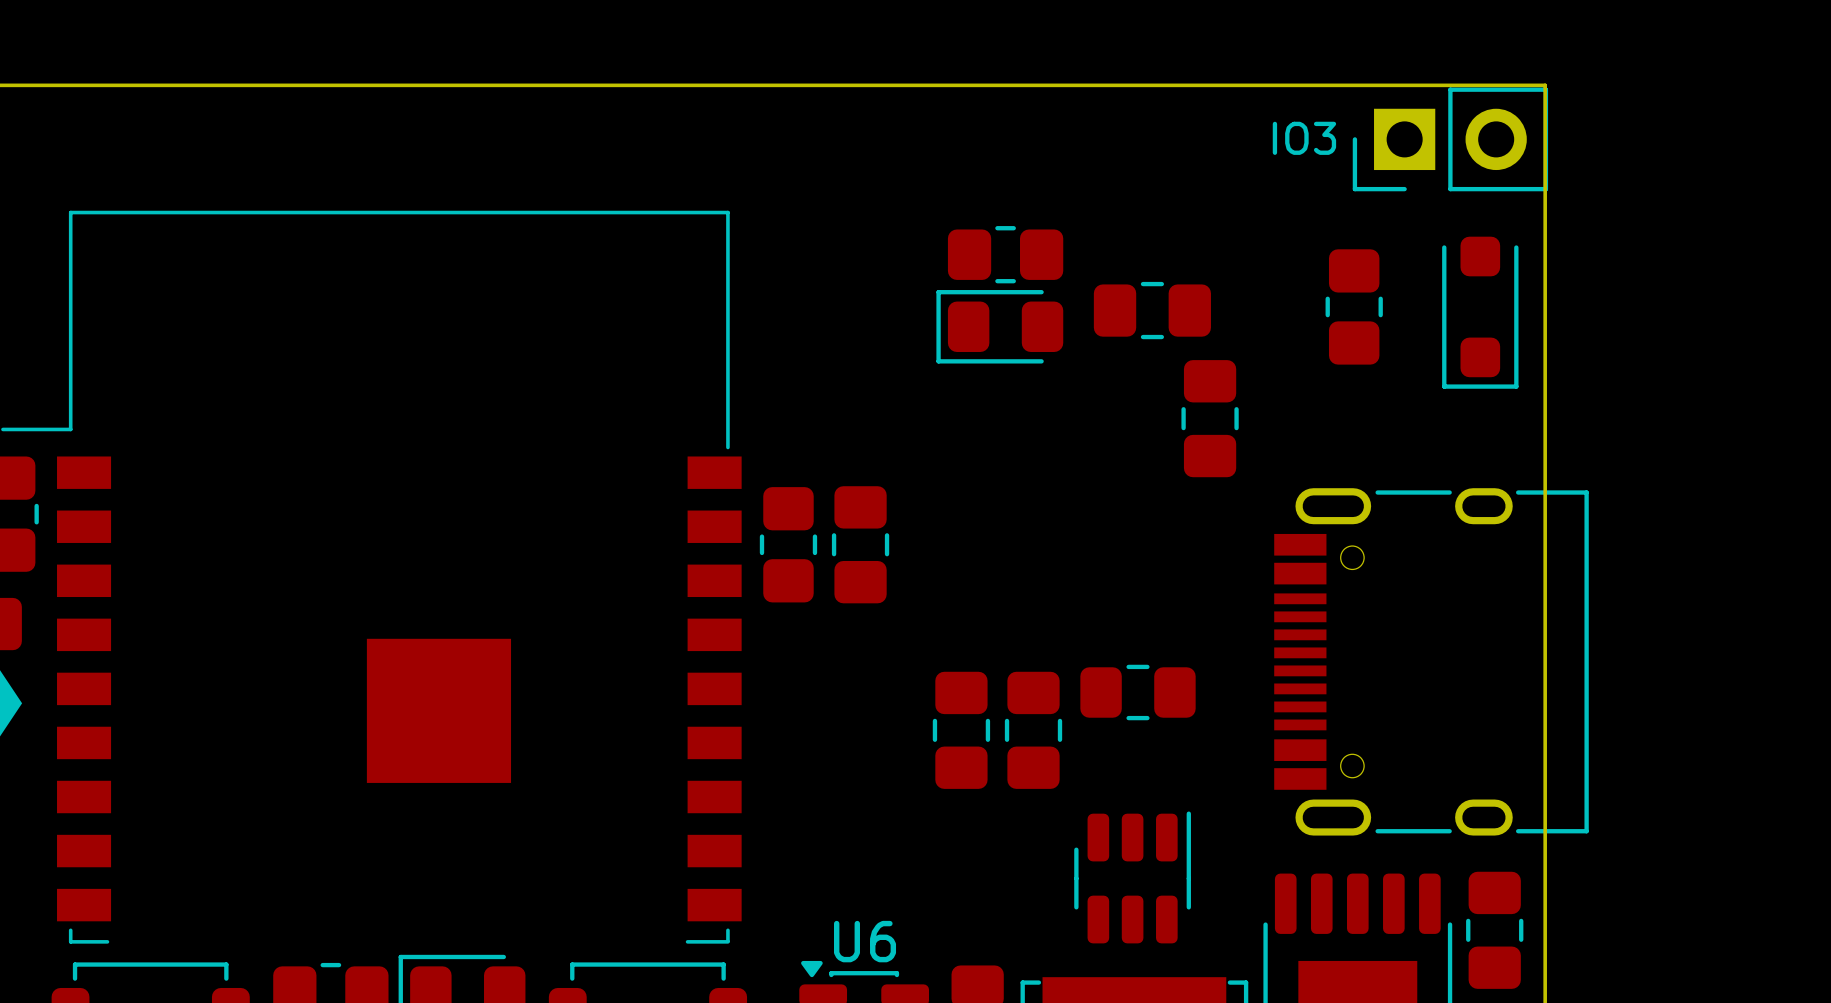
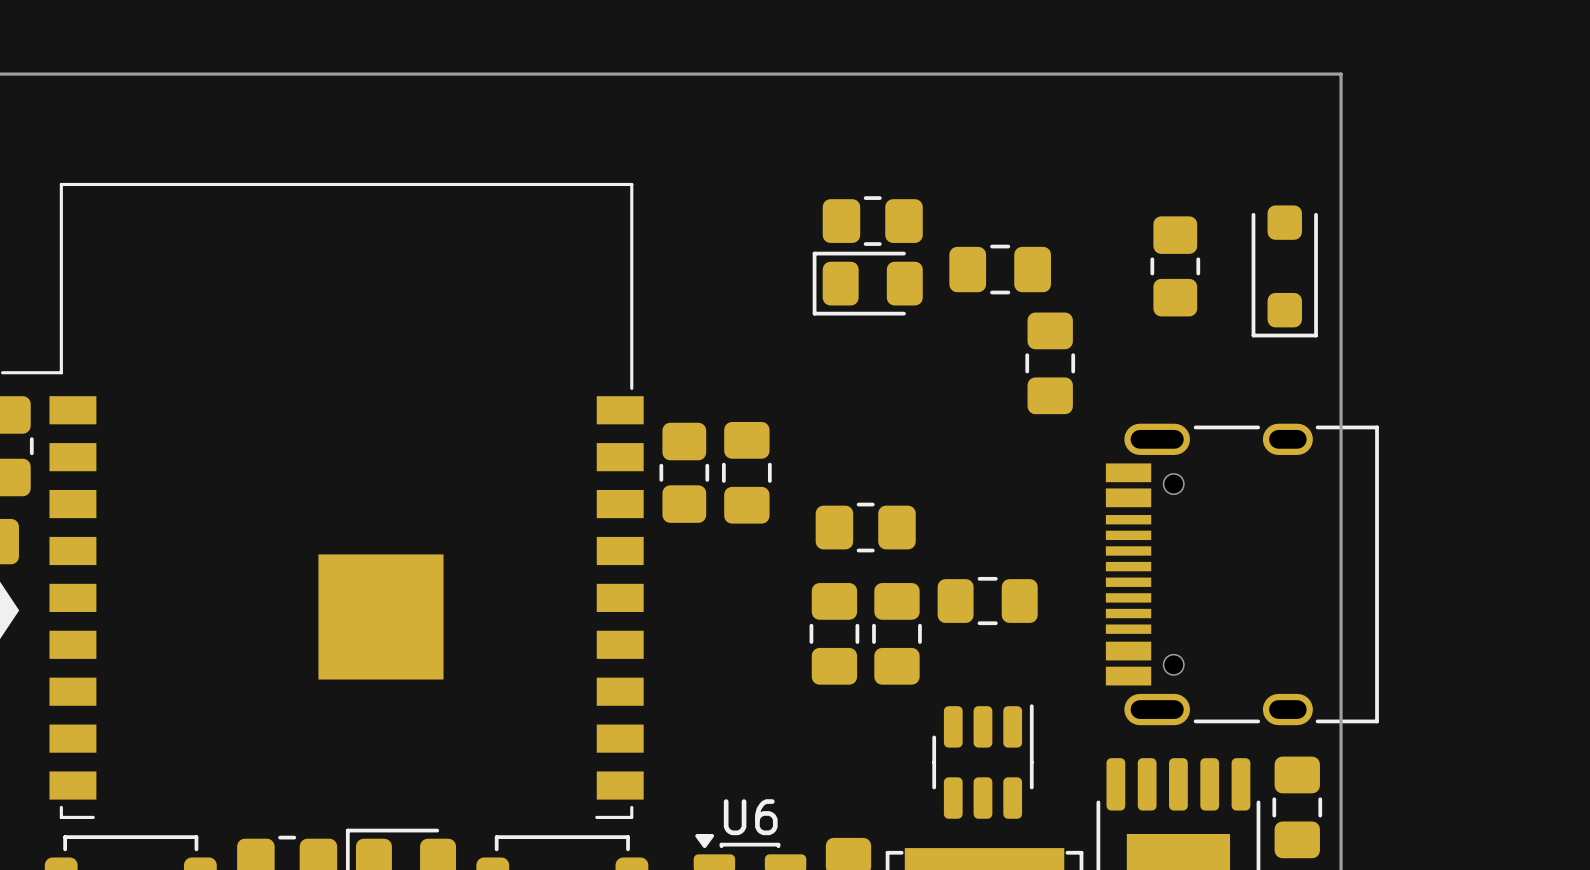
text: IO3 (1304, 138) -> none
part: (1450, 139) -> none
part: none -> (865, 527)

